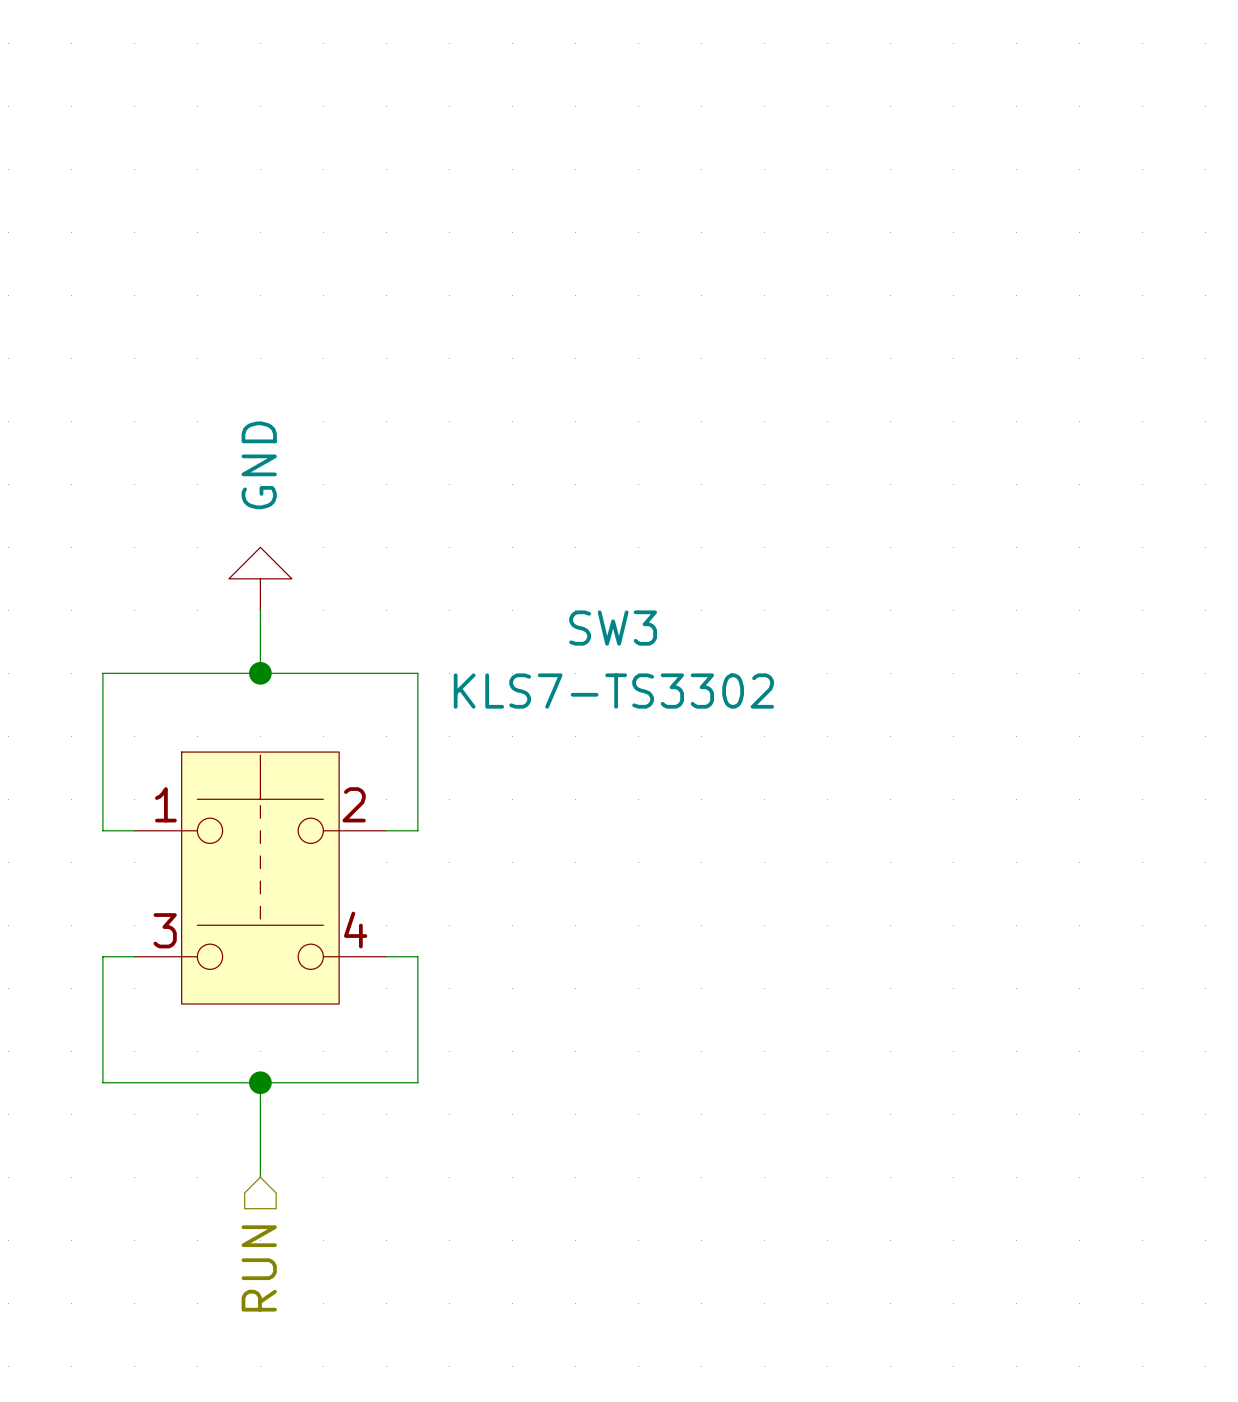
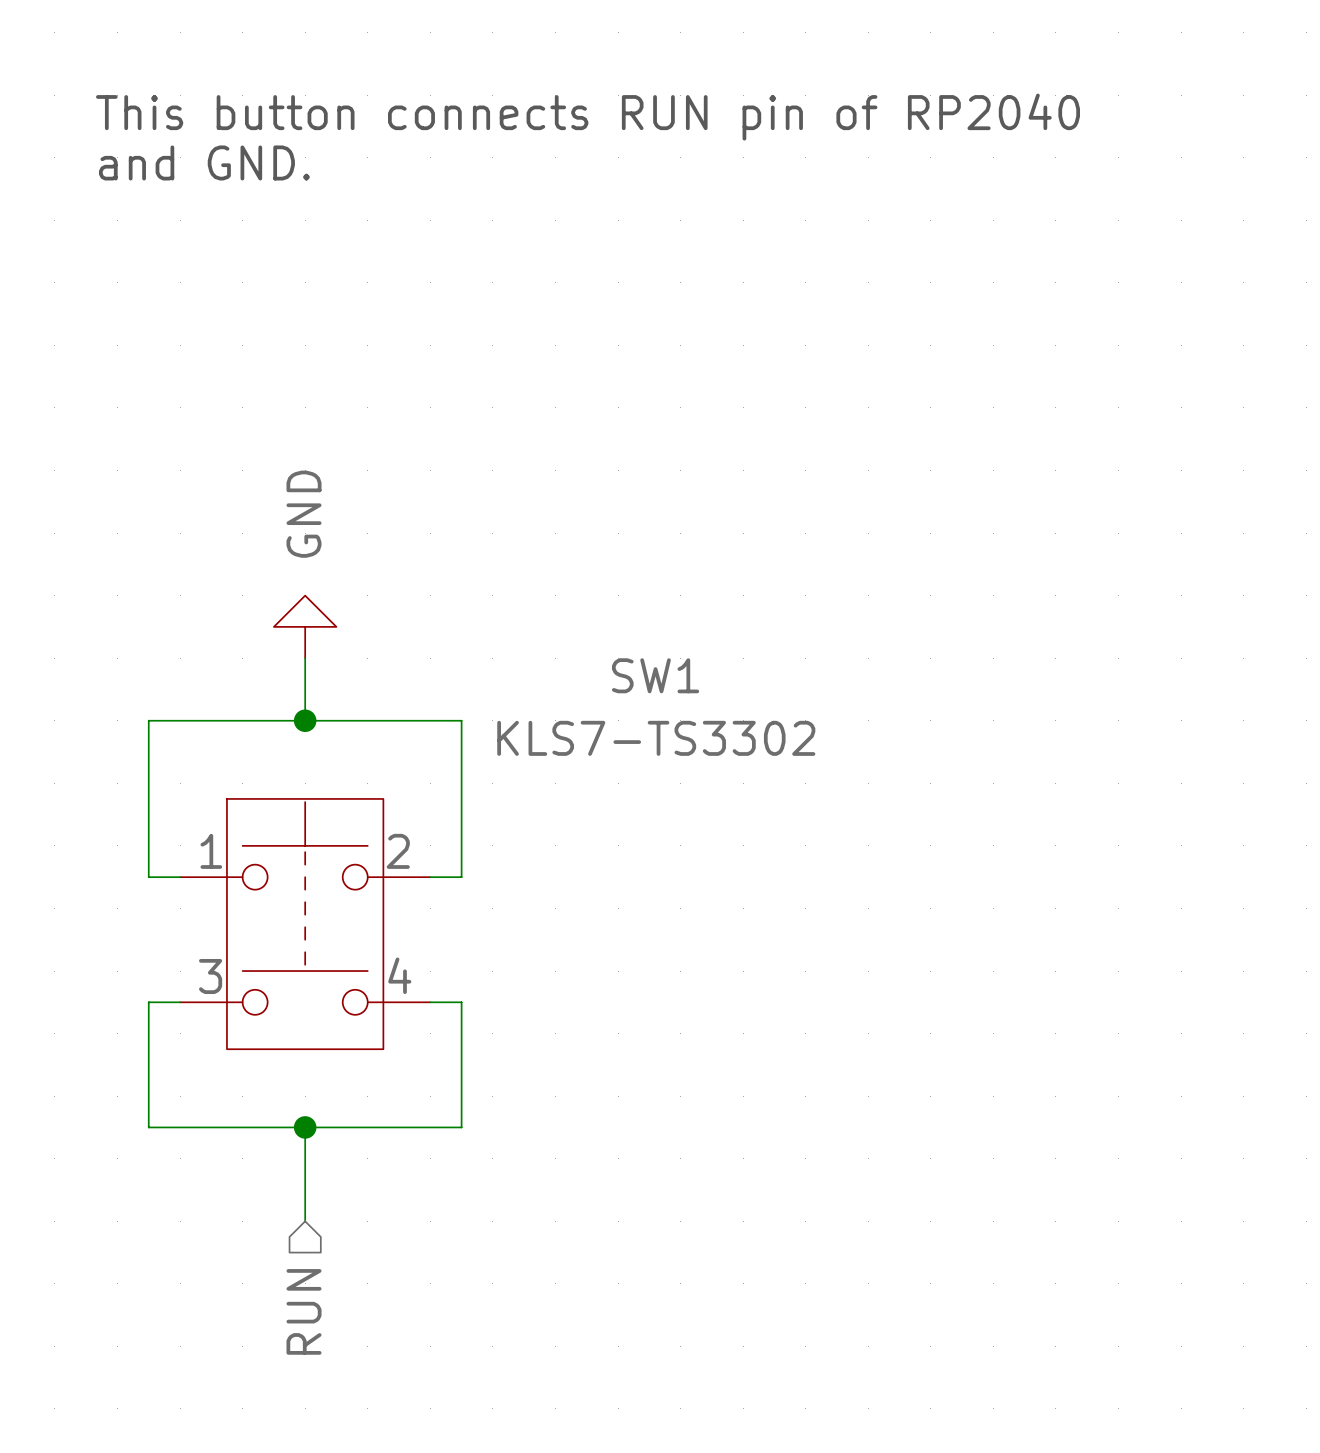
text: none -> This button connects RUN pin of RP2040 (588, 117)
text: none -> and GND. (204, 162)
SW3 name: SW3 (613, 628) -> SW1 (655, 675)

